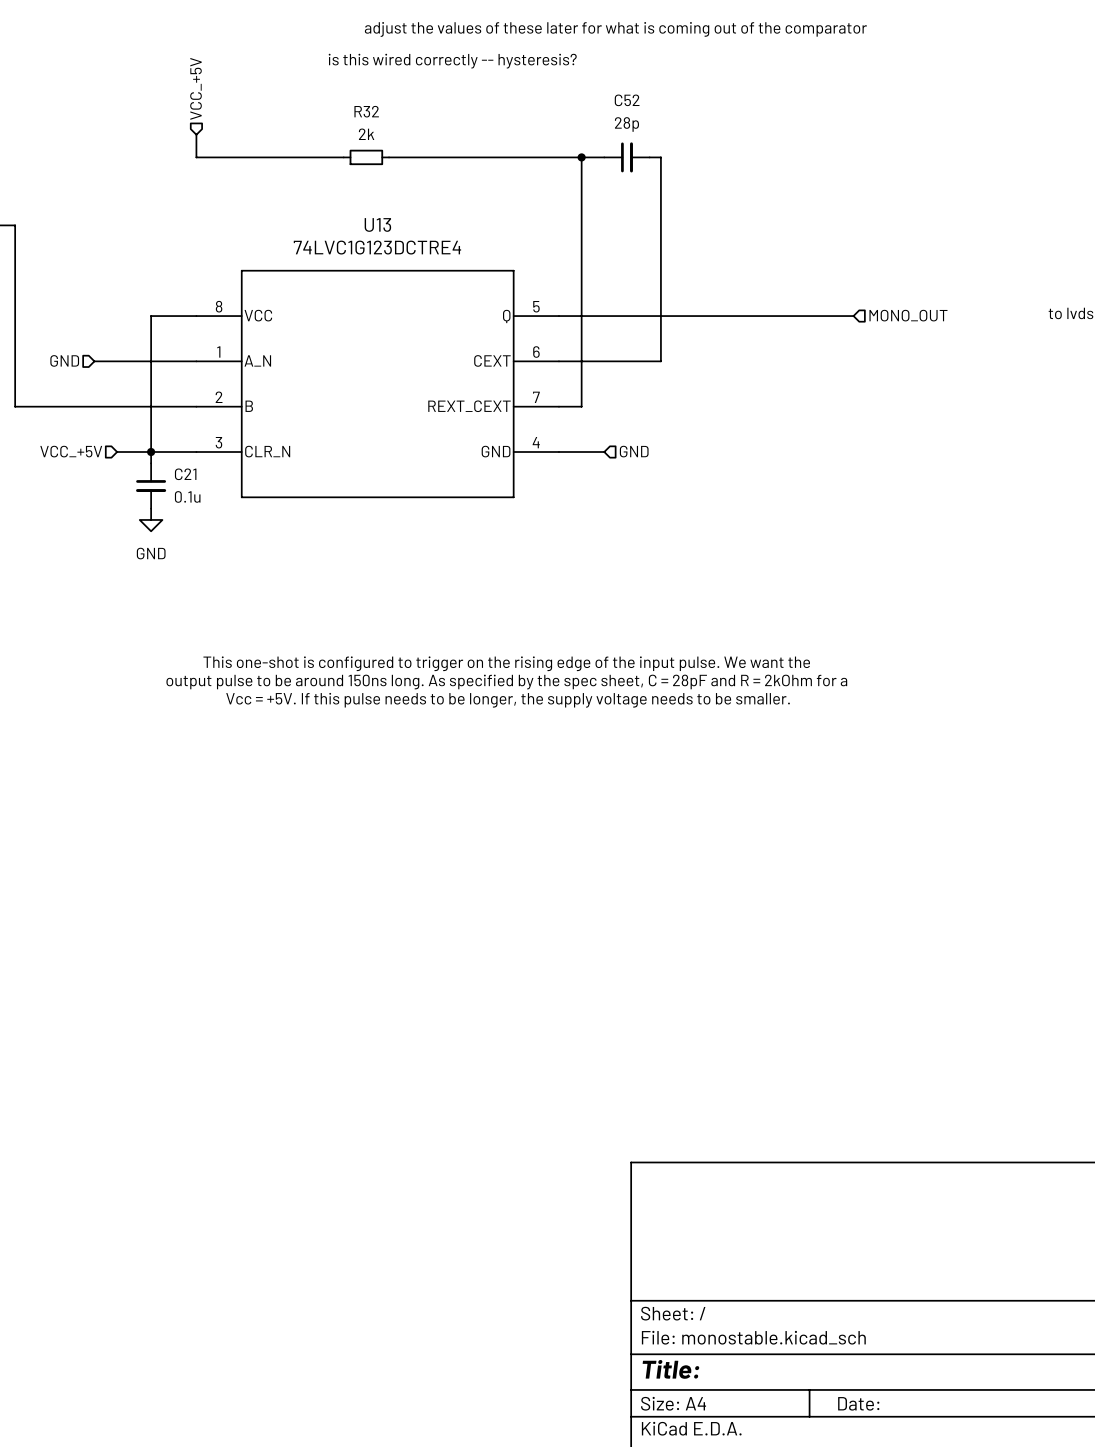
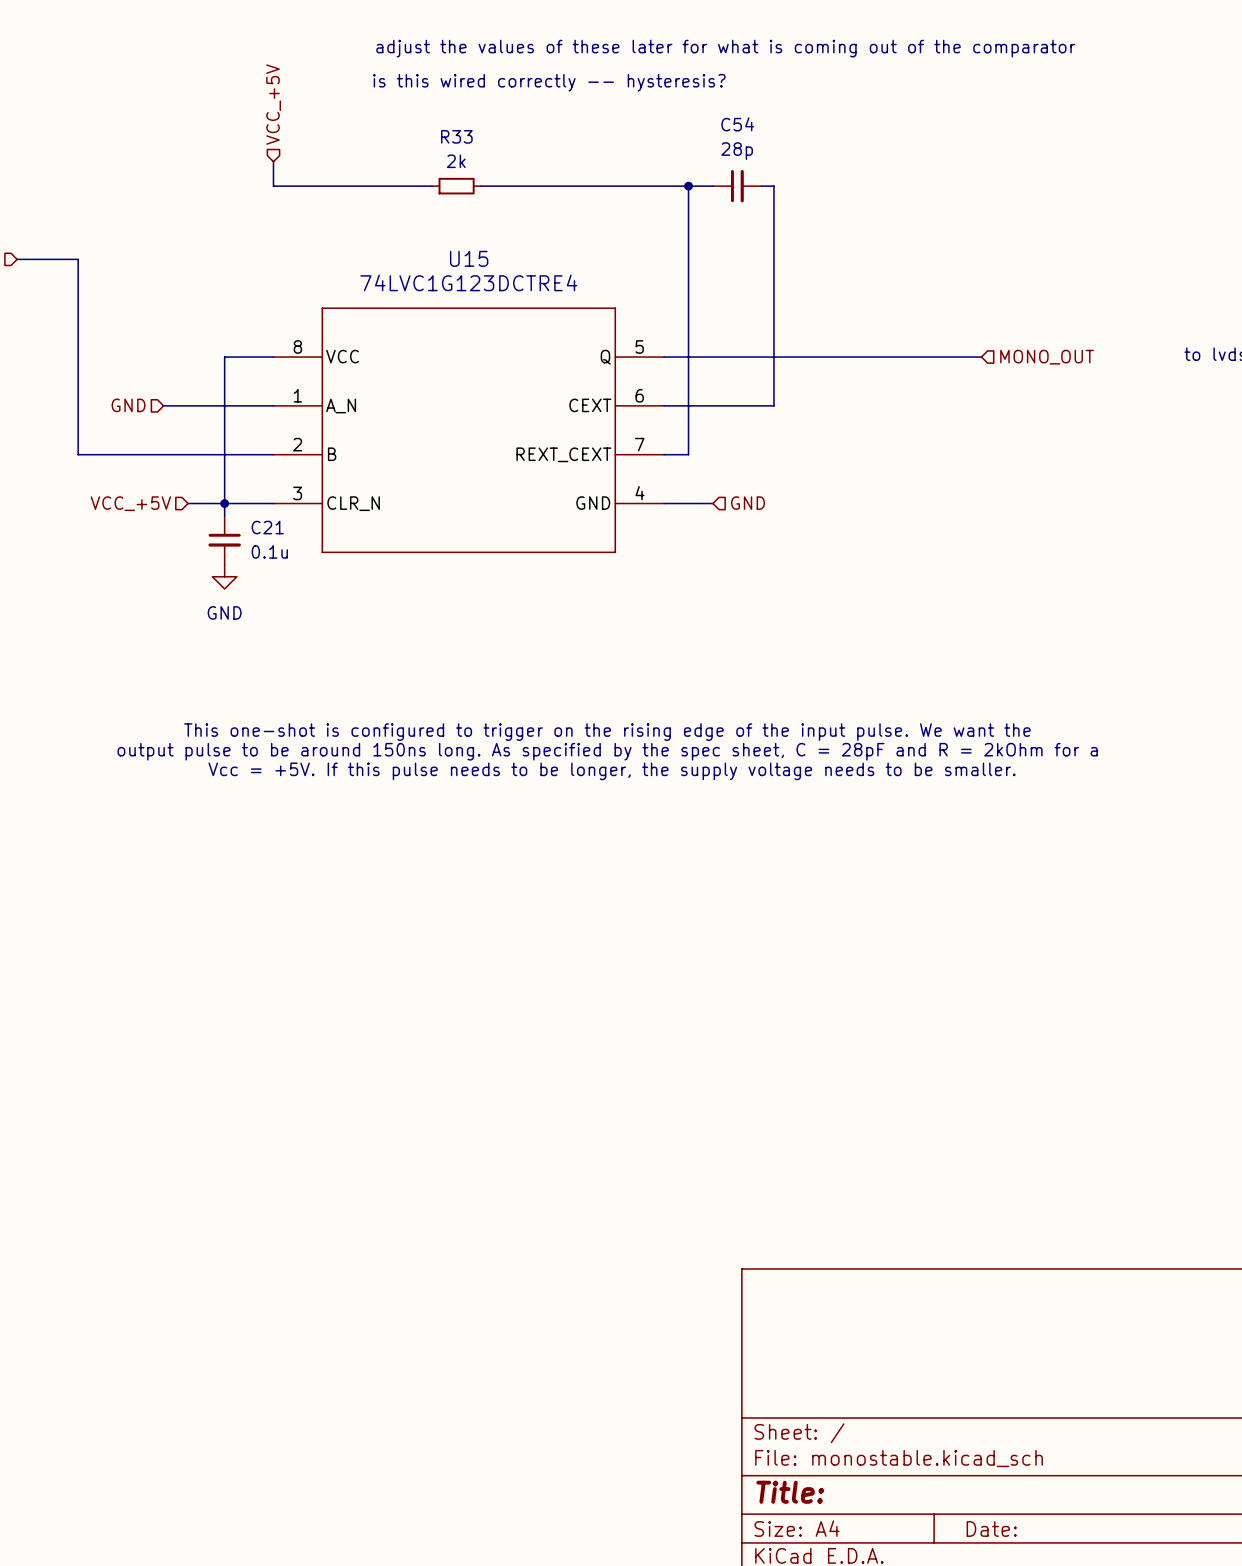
C52 name: C52 (627, 100) -> C54 (737, 124)
R32 name: R32 (366, 111) -> R33 (456, 136)
U13 name: U13 (377, 224) -> U15 (469, 258)

